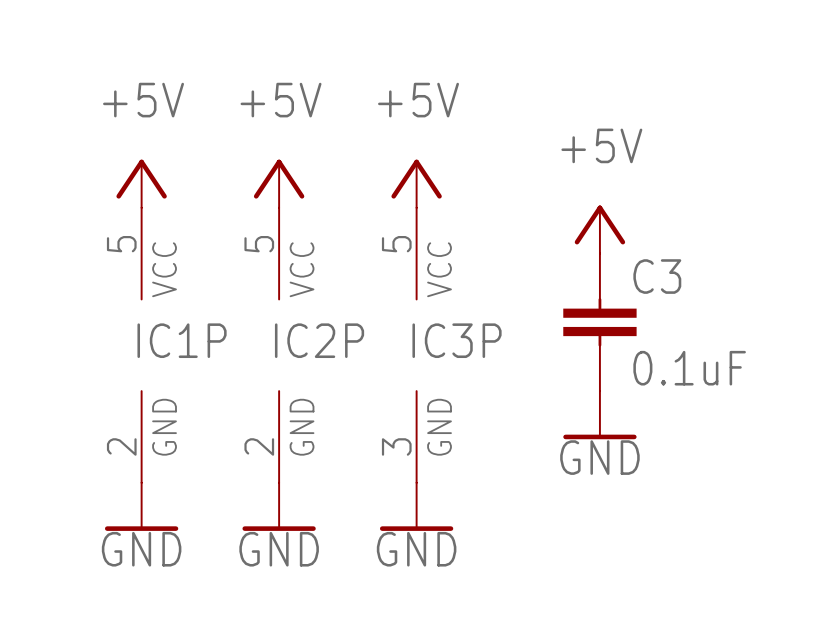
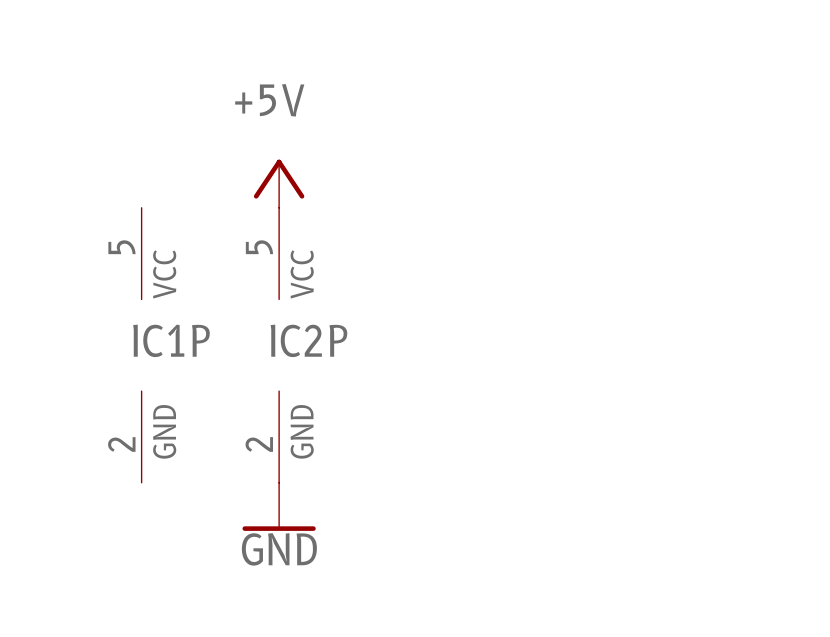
power symbol: +5V (141, 183) -> none
power symbol: +5V (416, 183) -> none
power symbol: +5V (599, 229) -> none
C3: 0.1uF (599, 322) -> none
IC3P: (416, 345) -> none
power symbol: GND (599, 415) -> none
power symbol: GND (141, 506) -> none
power symbol: GND (416, 506) -> none

